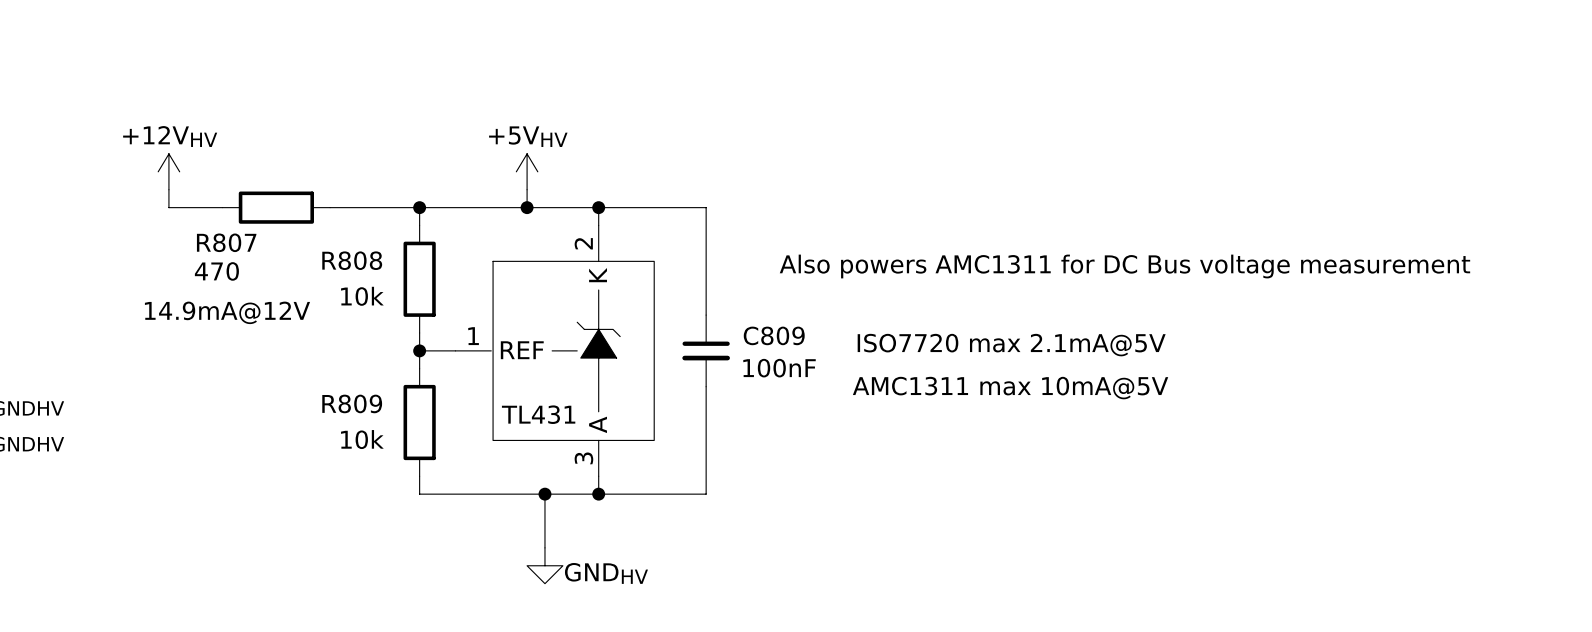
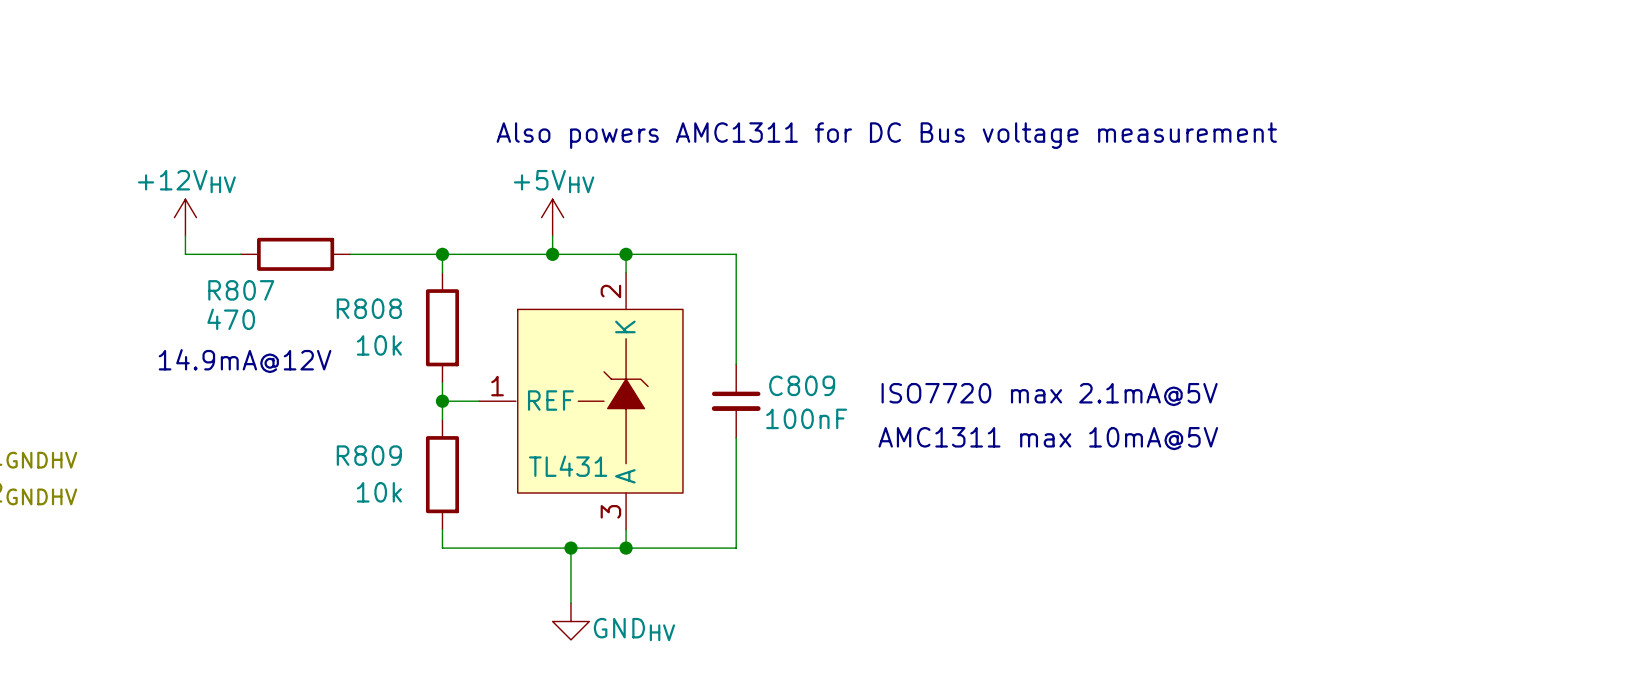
text position: Also powers AMC1311 for DC Bus voltage measurement (1124, 266) -> Also powers AMC1311 for DC Bus voltage measurement (886, 135)

